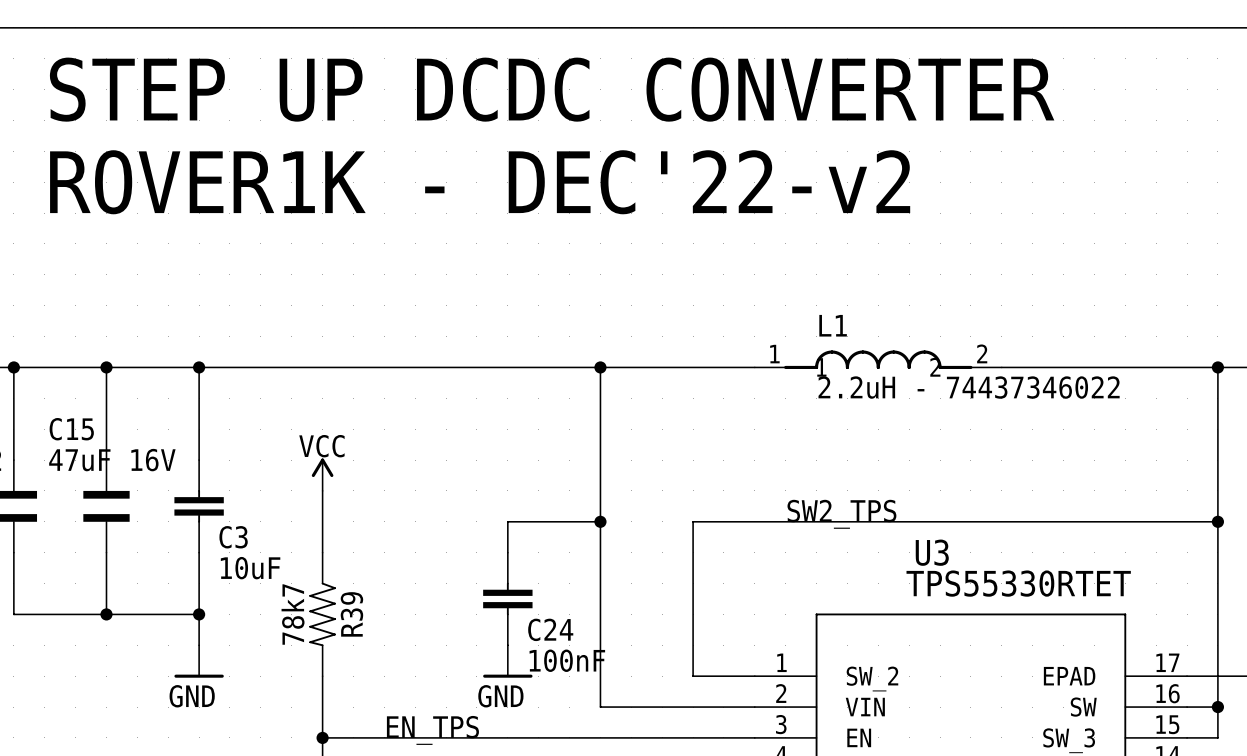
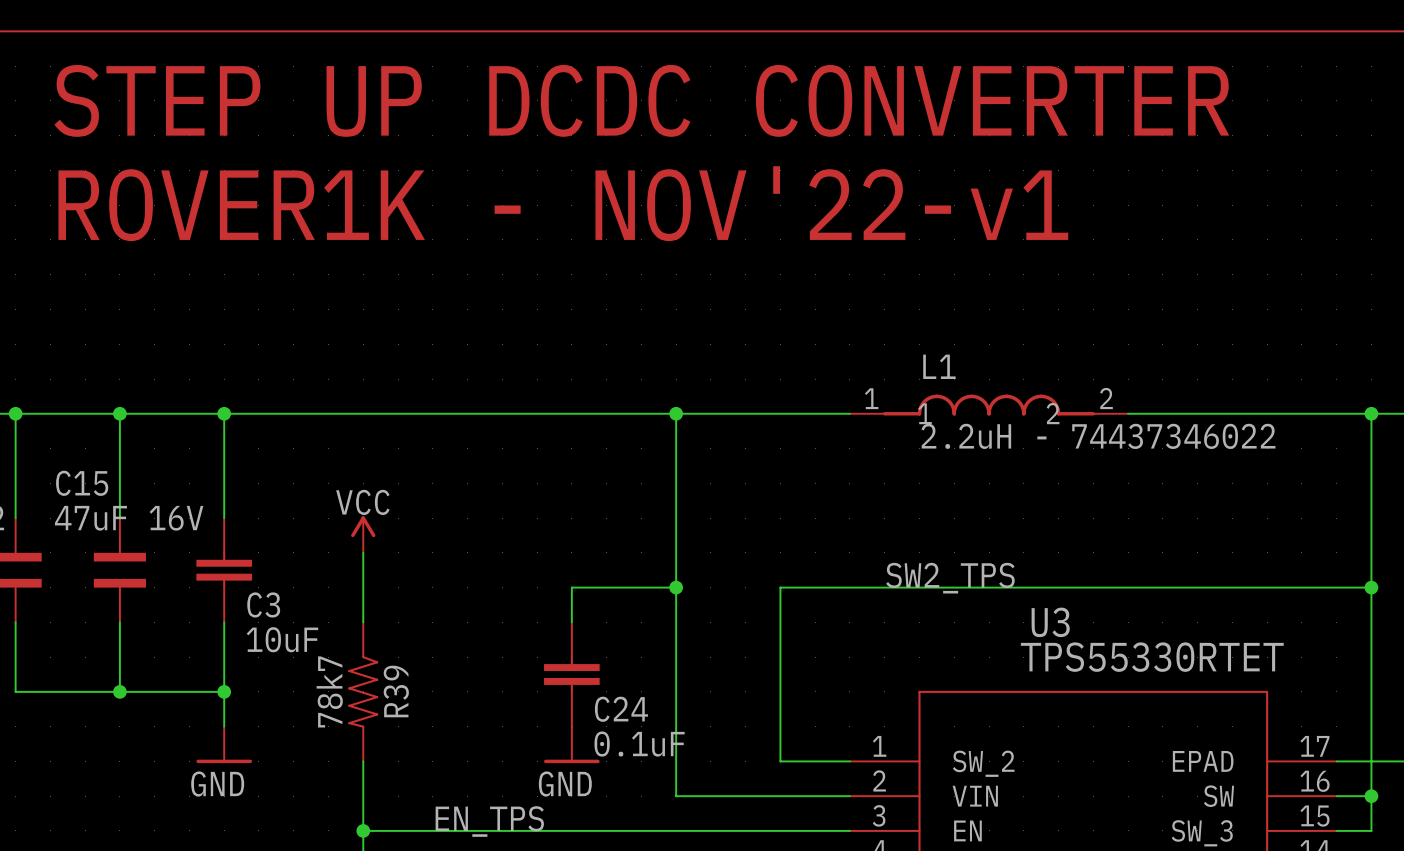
text: ROVER1K - DEC'22-v2 (480, 182) -> ROVER1K - NOV'22-v1 (563, 203)
C24 value: 100nF (567, 660) -> 0.1uF (639, 744)

